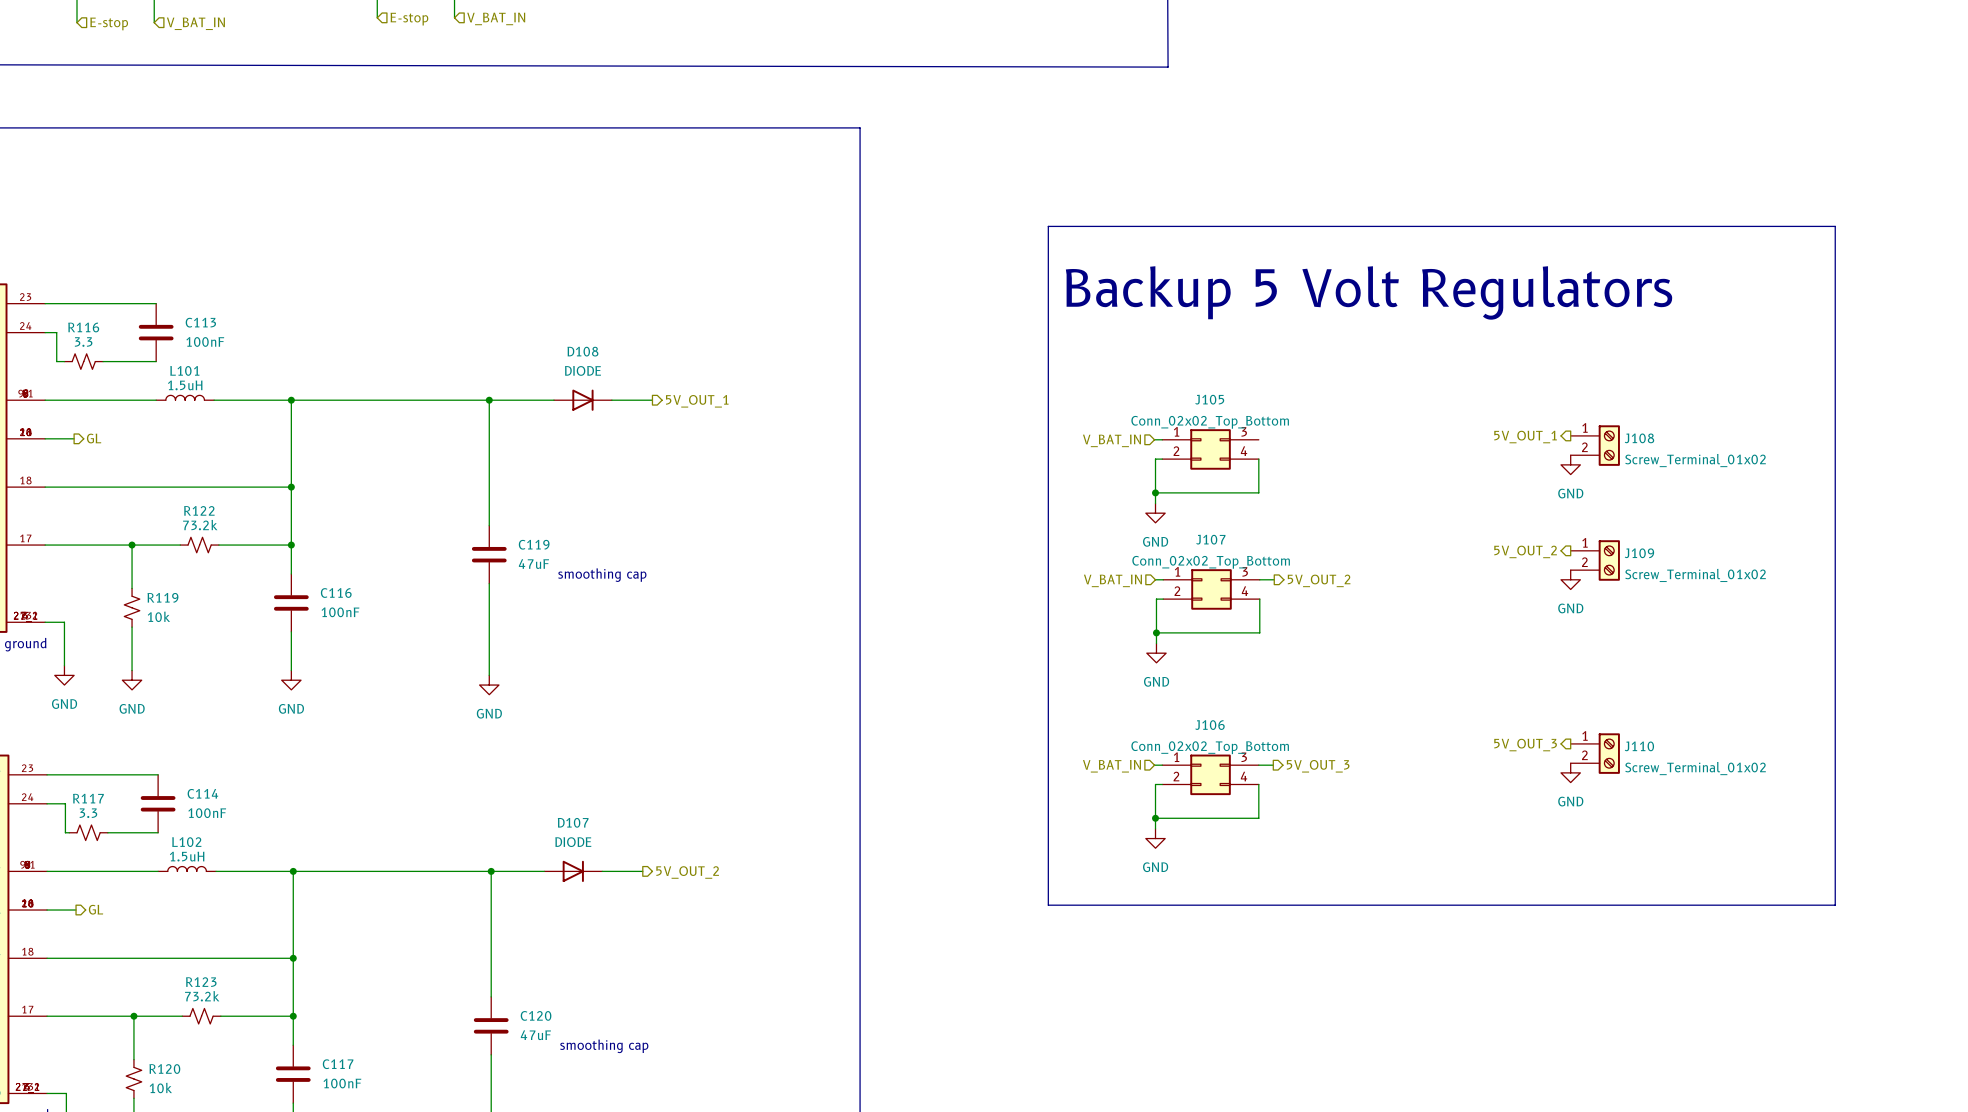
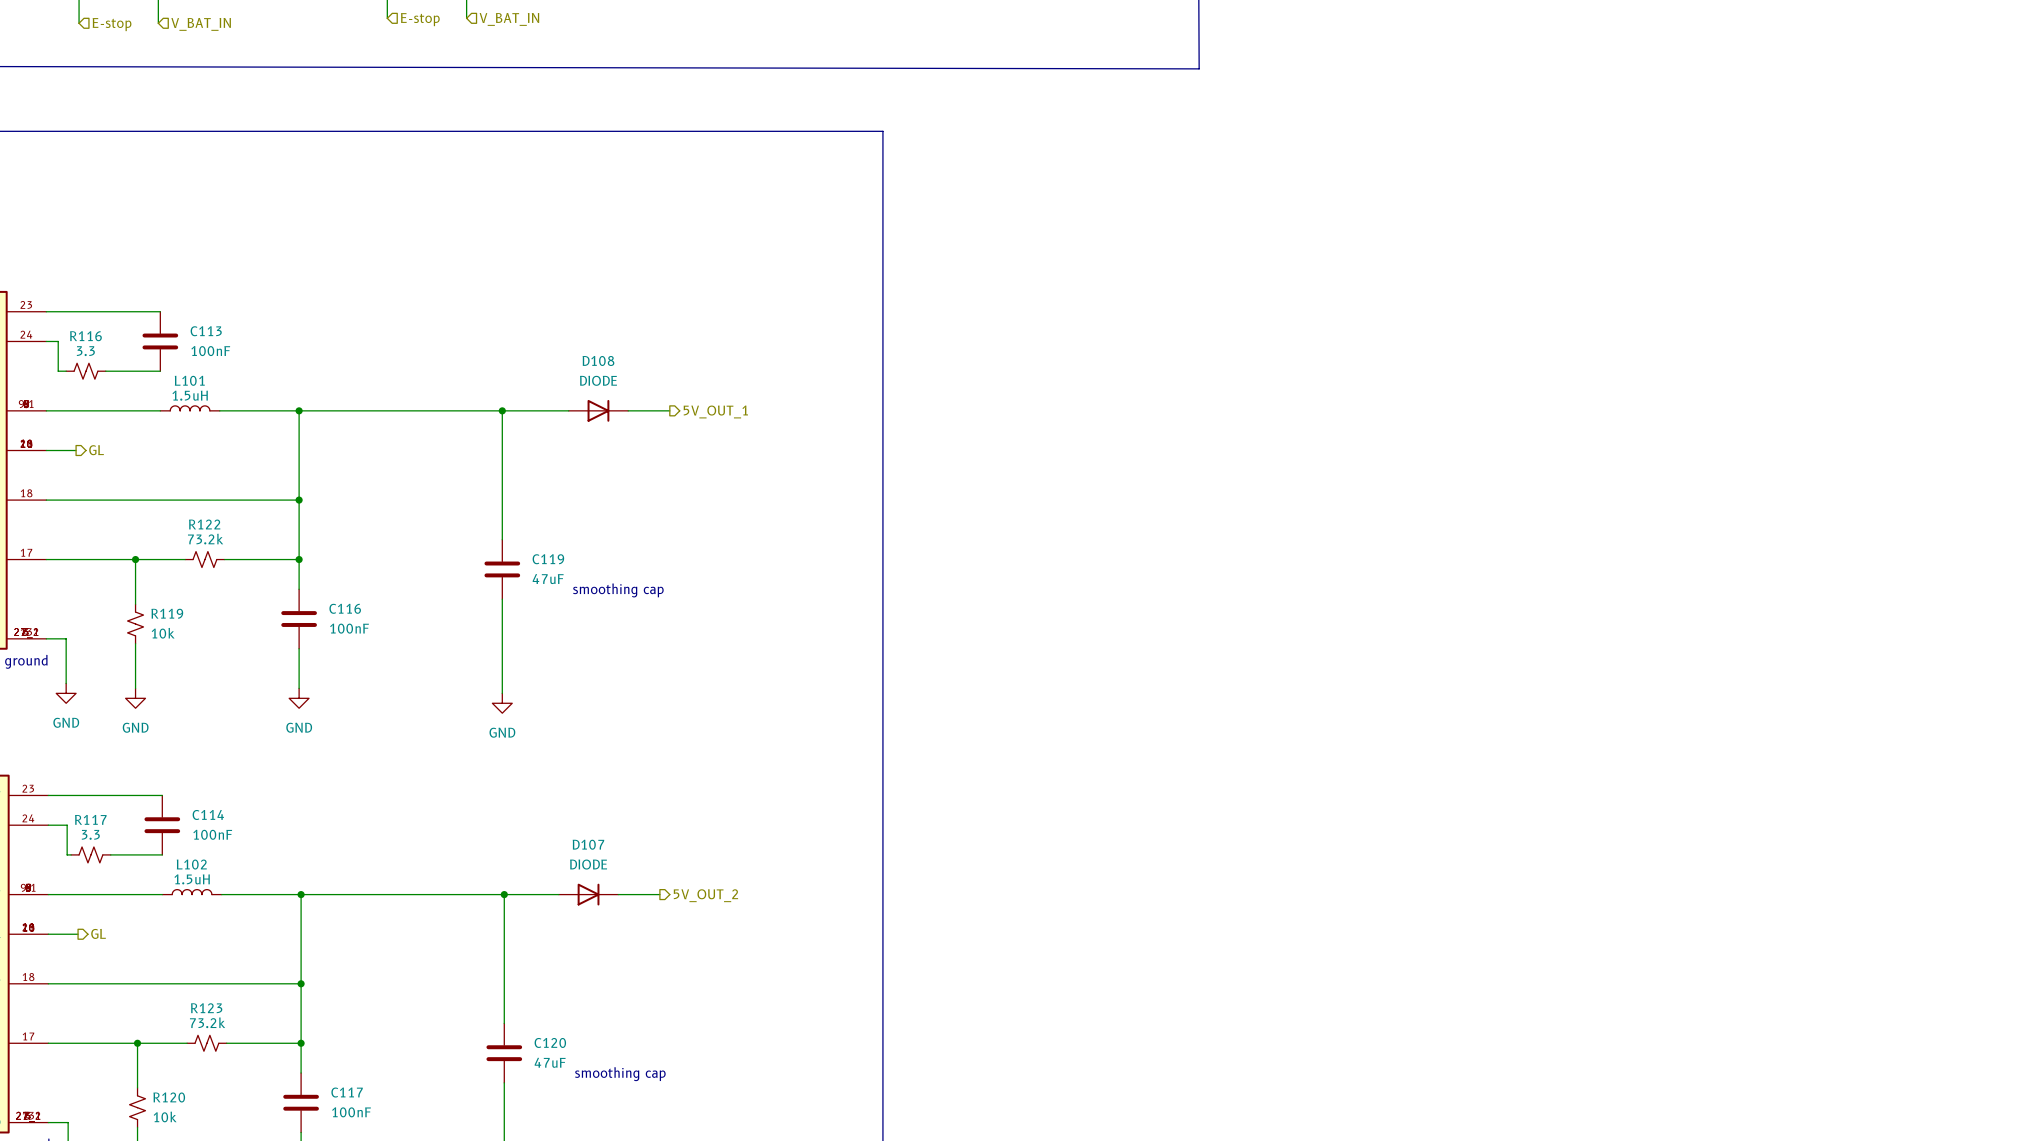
line: (1048, 226) (1835, 226) (1835, 905) (1048, 905) (1048, 226) -> none
text: Backup 5 Volt Regulators (1369, 292) -> none
hierarchical label: 5V_OUT_1 (1525, 437) -> none
wire: (1154, 439) (1162, 439) -> none
hierarchical label: V_BAT_IN (1111, 440) -> none
J108: Screw_Terminal_01x02 (1595, 445) -> none
J105: Conn_02x02_Top_Bottom (1210, 449) -> none
wire: (1162, 459) (1155, 459) (1155, 503) -> none
wire: (1258, 459) (1258, 492) (1155, 492) -> none
power symbol: GND (1570, 464) -> none
junction: (1155, 492) -> none
power symbol: GND (1155, 513) -> none
hierarchical label: 5V_OUT_2 (1525, 551) -> none
J109: Screw_Terminal_01x02 (1595, 560) -> none
wire: (1155, 579) (1163, 579) -> none
wire: (1259, 579) (1274, 579) -> none
power symbol: GND (1570, 579) -> none
hierarchical label: V_BAT_IN (1112, 580) -> none
hierarchical label: 5V_OUT_2 (1319, 580) -> none
J107: Conn_02x02_Top_Bottom (1211, 589) -> none
wire: (1163, 599) (1156, 599) (1156, 643) -> none
wire: (1259, 599) (1259, 632) (1156, 632) -> none
junction: (1156, 632) -> none
power symbol: GND (1156, 653) -> none
hierarchical label: 5V_OUT_3 (1525, 745) -> none
J110: Screw_Terminal_01x02 (1595, 753) -> none
wire: (1154, 765) (1162, 765) -> none
wire: (1258, 765) (1273, 765) -> none
hierarchical label: V_BAT_IN (1111, 766) -> none
hierarchical label: 5V_OUT_3 (1318, 766) -> none
power symbol: GND (1570, 772) -> none
J106: Conn_02x02_Top_Bottom (1210, 774) -> none
wire: (1162, 784) (1155, 784) (1155, 828) -> none
wire: (1258, 784) (1258, 818) (1155, 818) -> none
junction: (1155, 818) -> none
power symbol: GND (1155, 838) -> none

